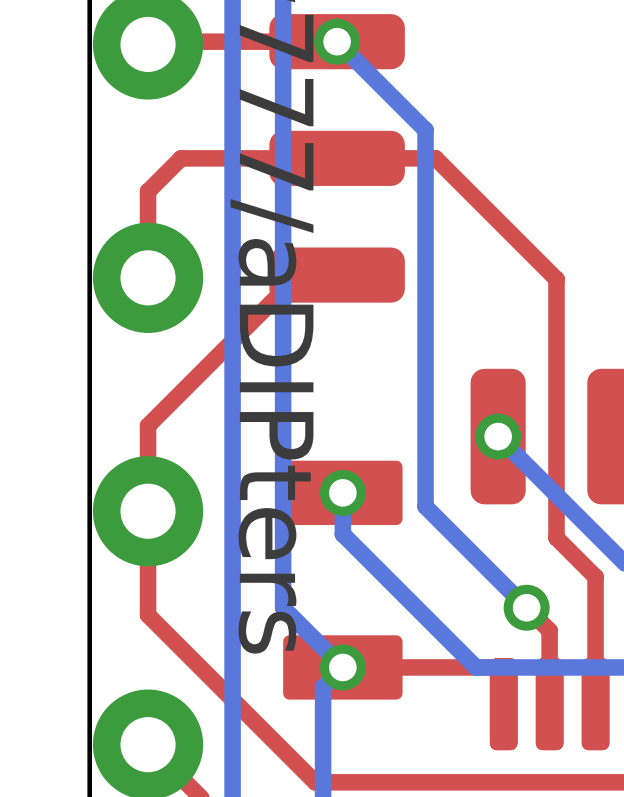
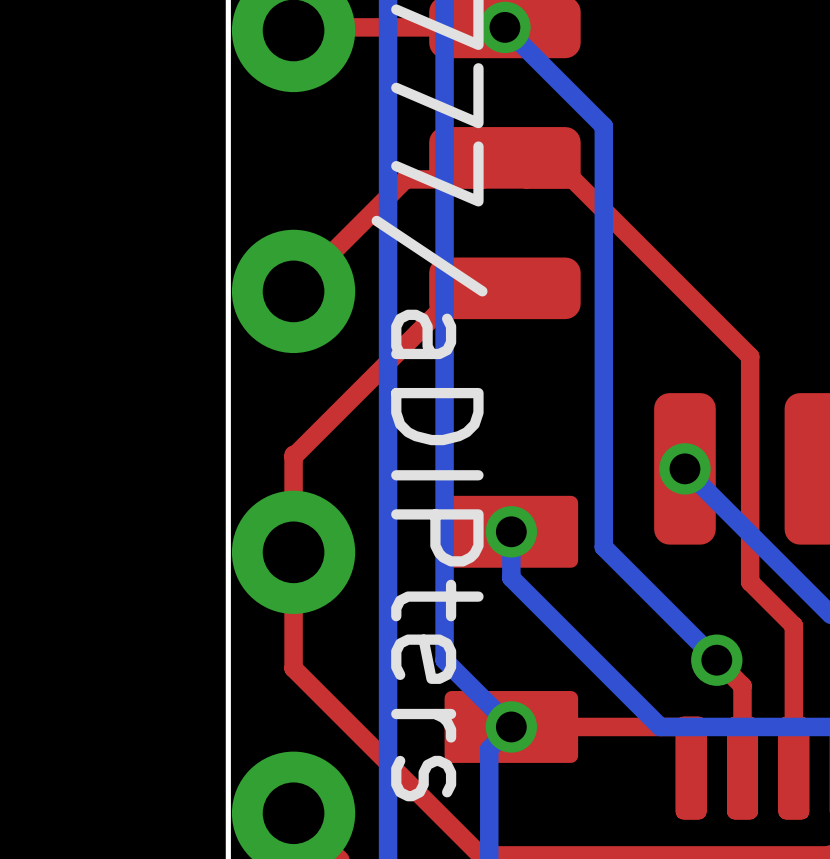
top track: (148, 277) (148, 191) (181, 158) (435, 158) (556, 279) (556, 336) -> (293, 291) (405, 179) (483, 179) (504, 157) (526, 179) (572, 179) (750, 356)

